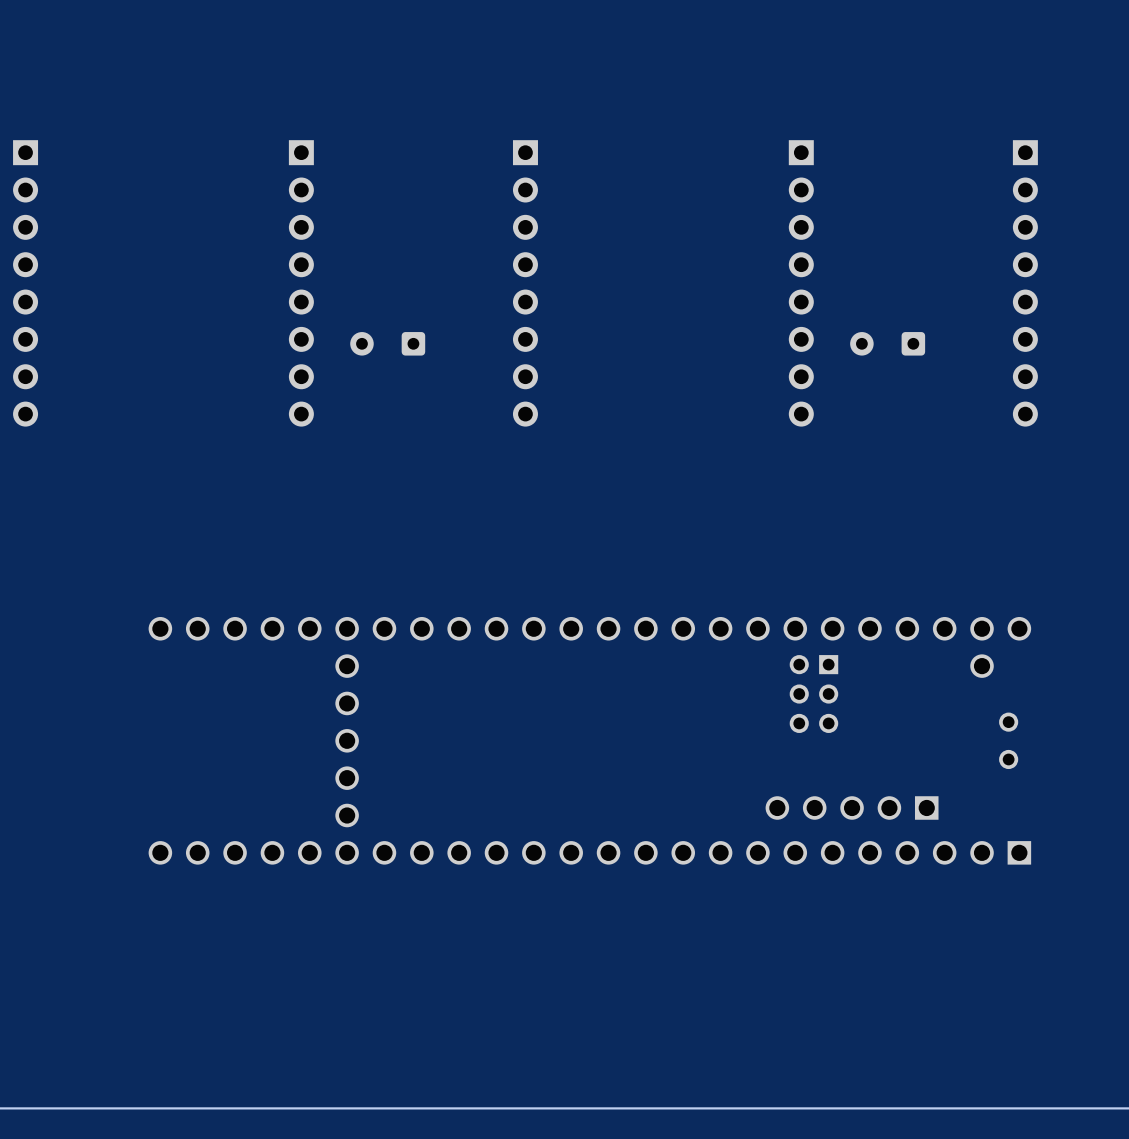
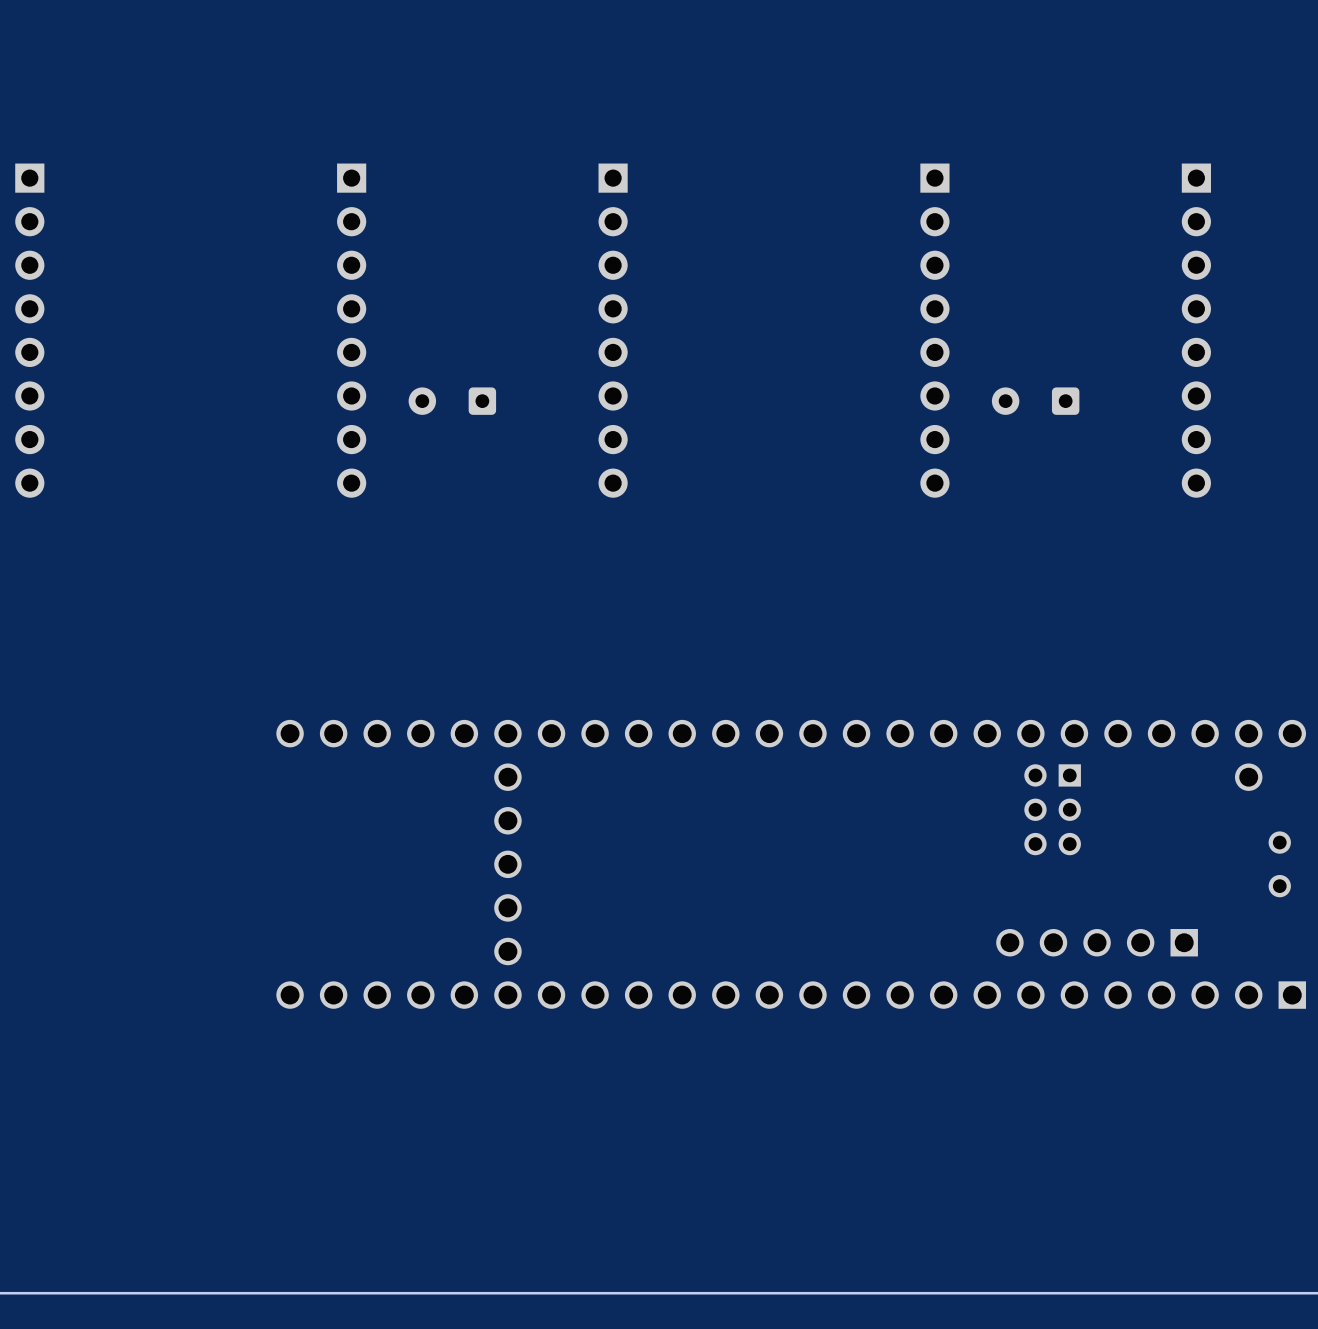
part position: (589, 740) -> (791, 864)

